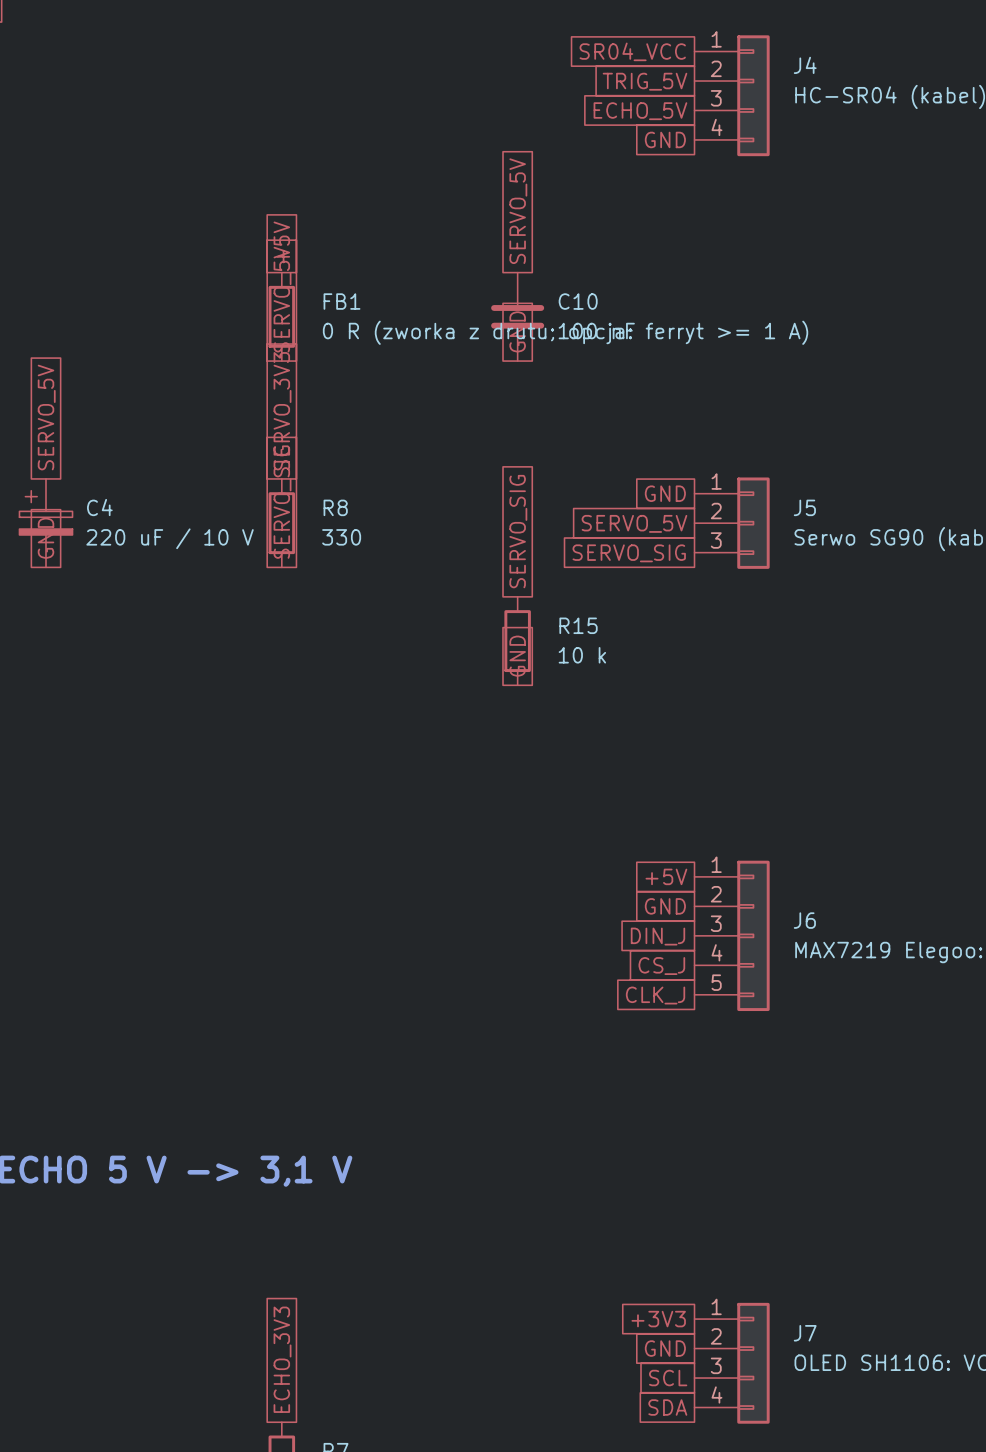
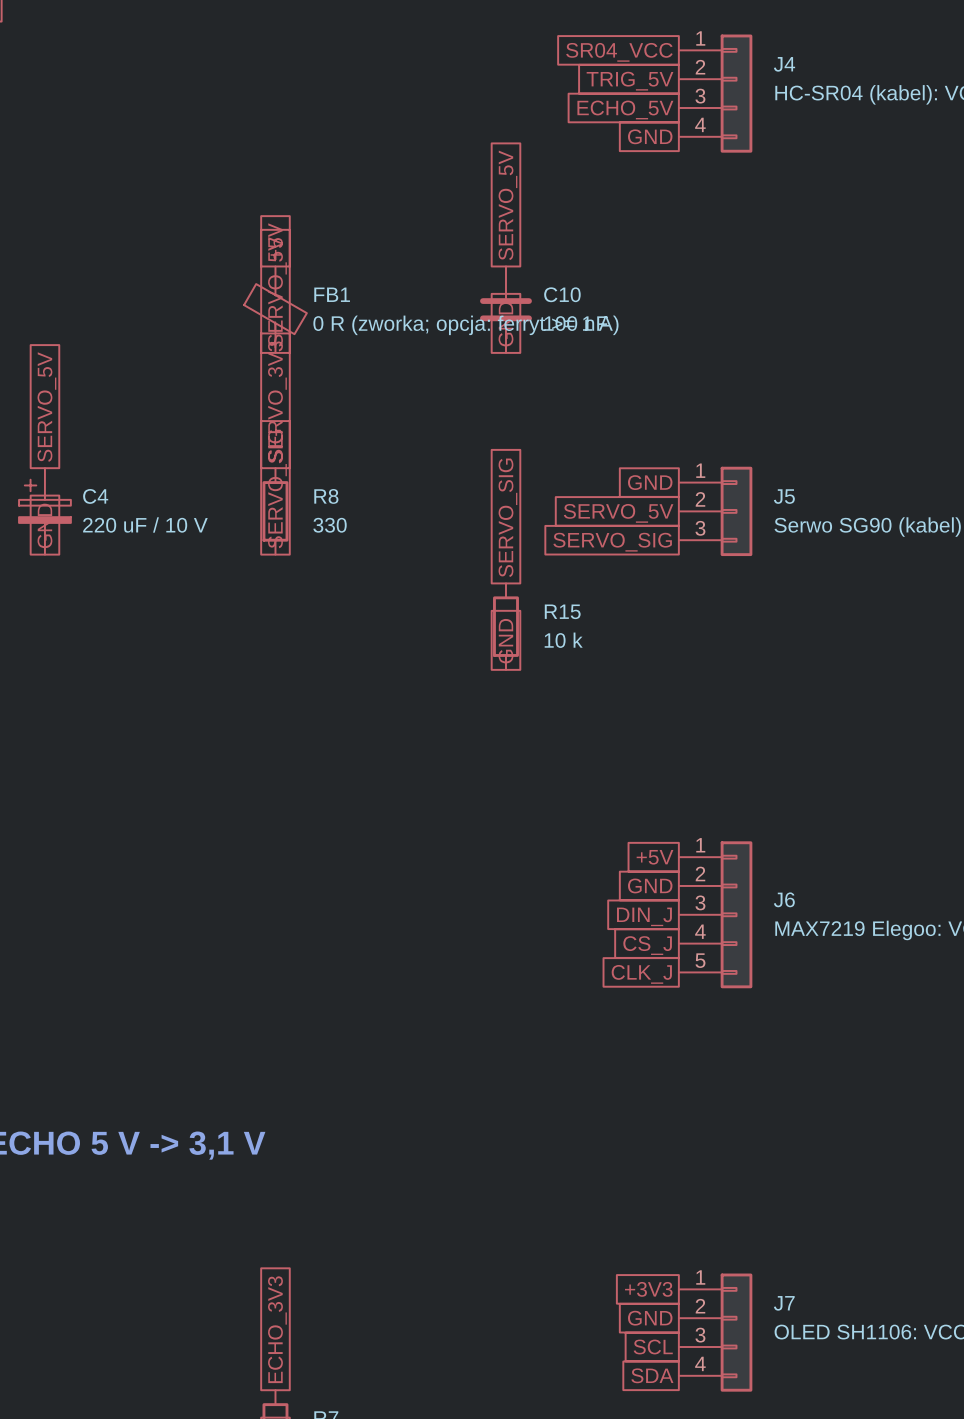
FB1 symbol: [268, 272, 296, 362] -> [244, 266, 307, 353]
FB1 value: 0 R (zworka z drutu; opcja: ferryt >= 1 A) (565, 332) -> 0 R (zworka; opcja: ferryt >= 1 A) (465, 325)

